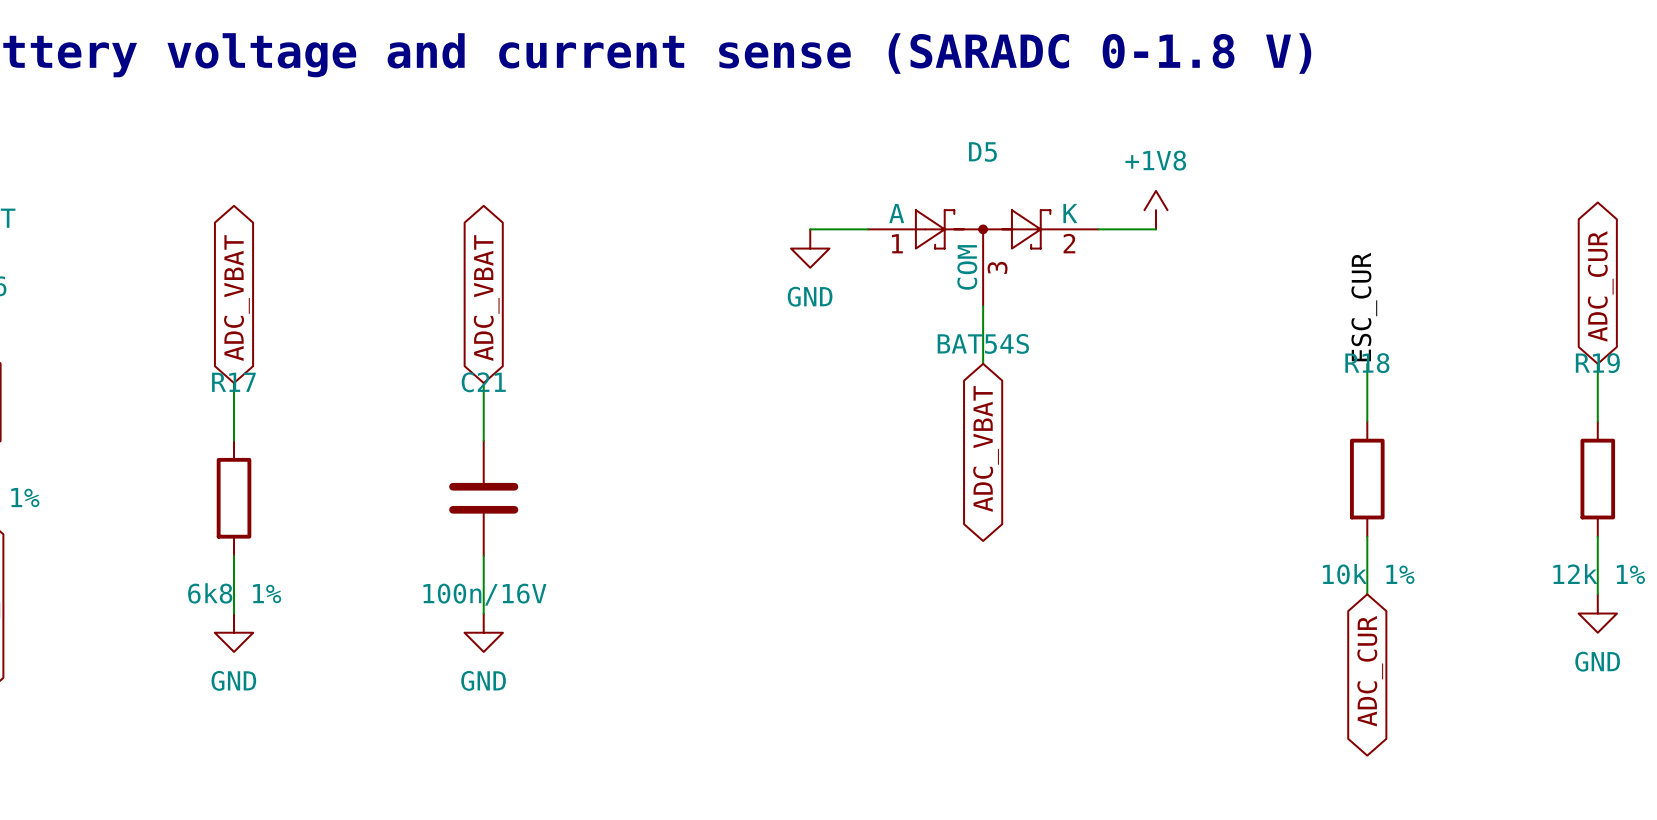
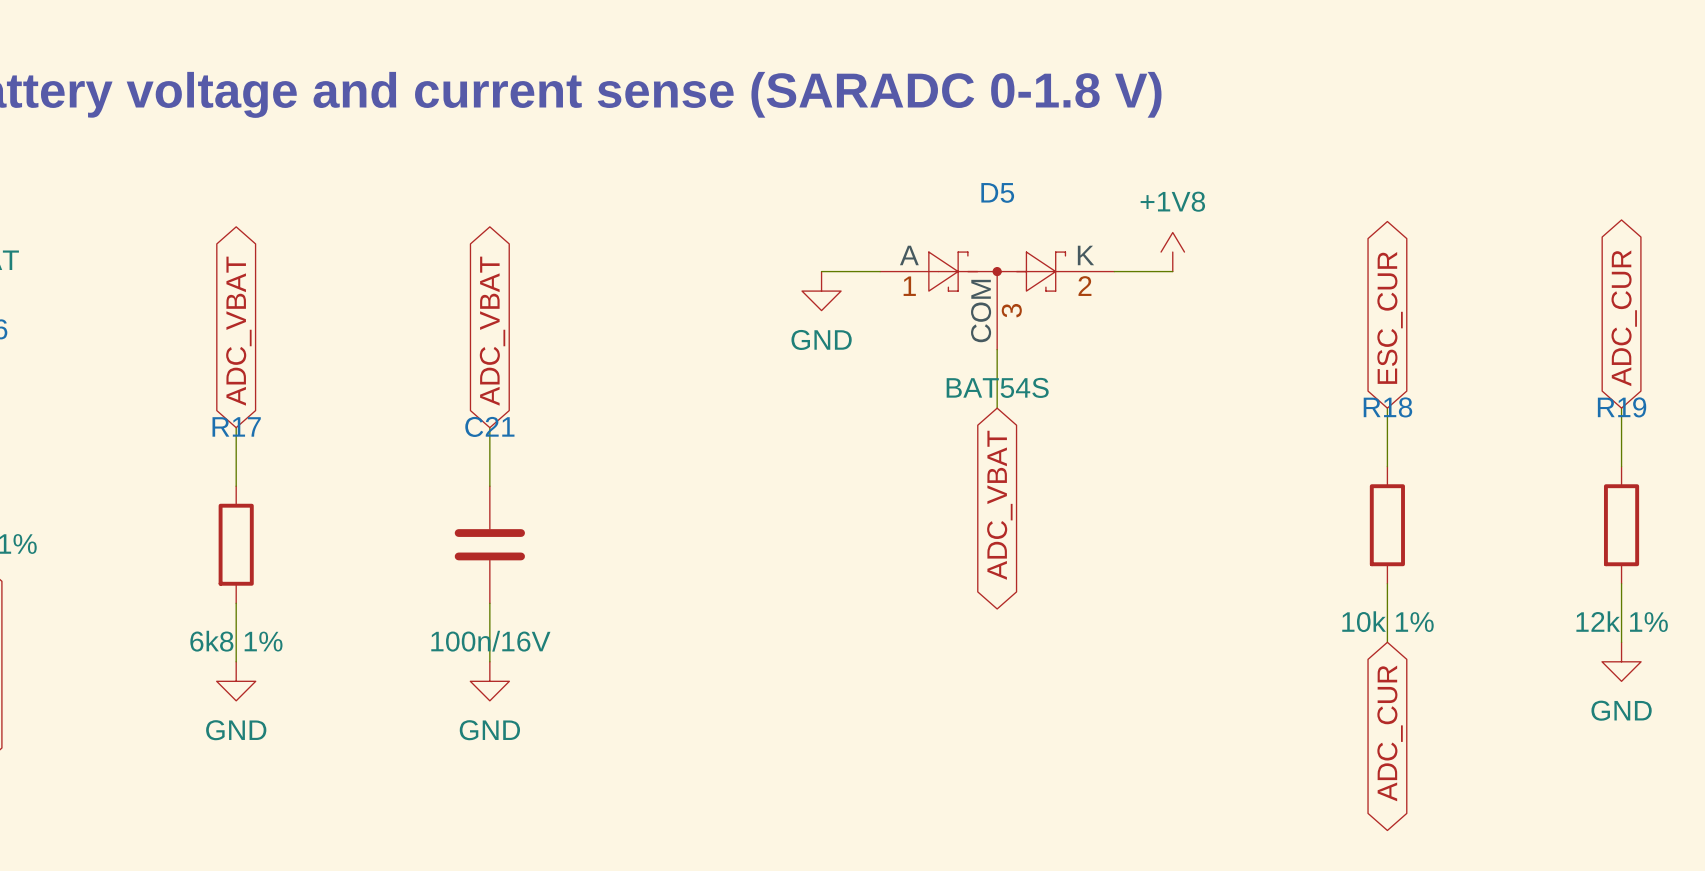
global label: none -> ESC_CUR (1390, 317)
label: ESC_CUR (1364, 307) -> none

